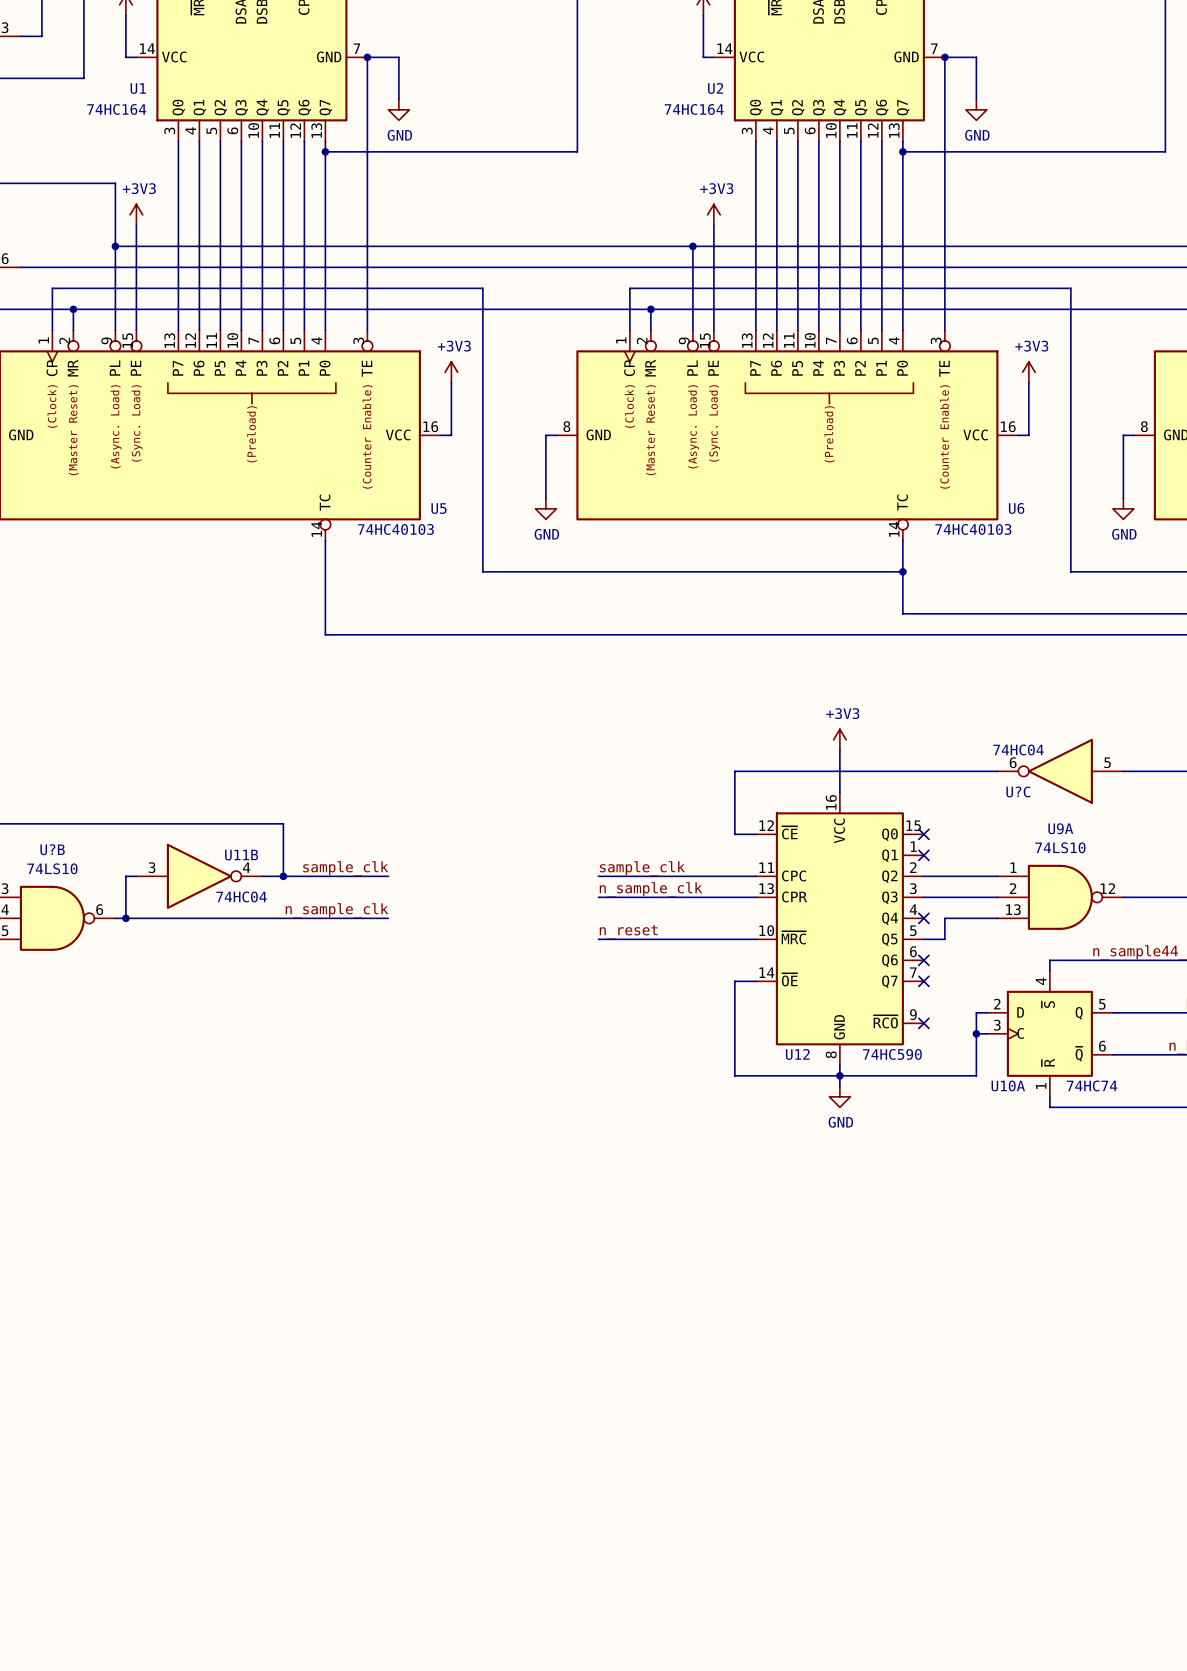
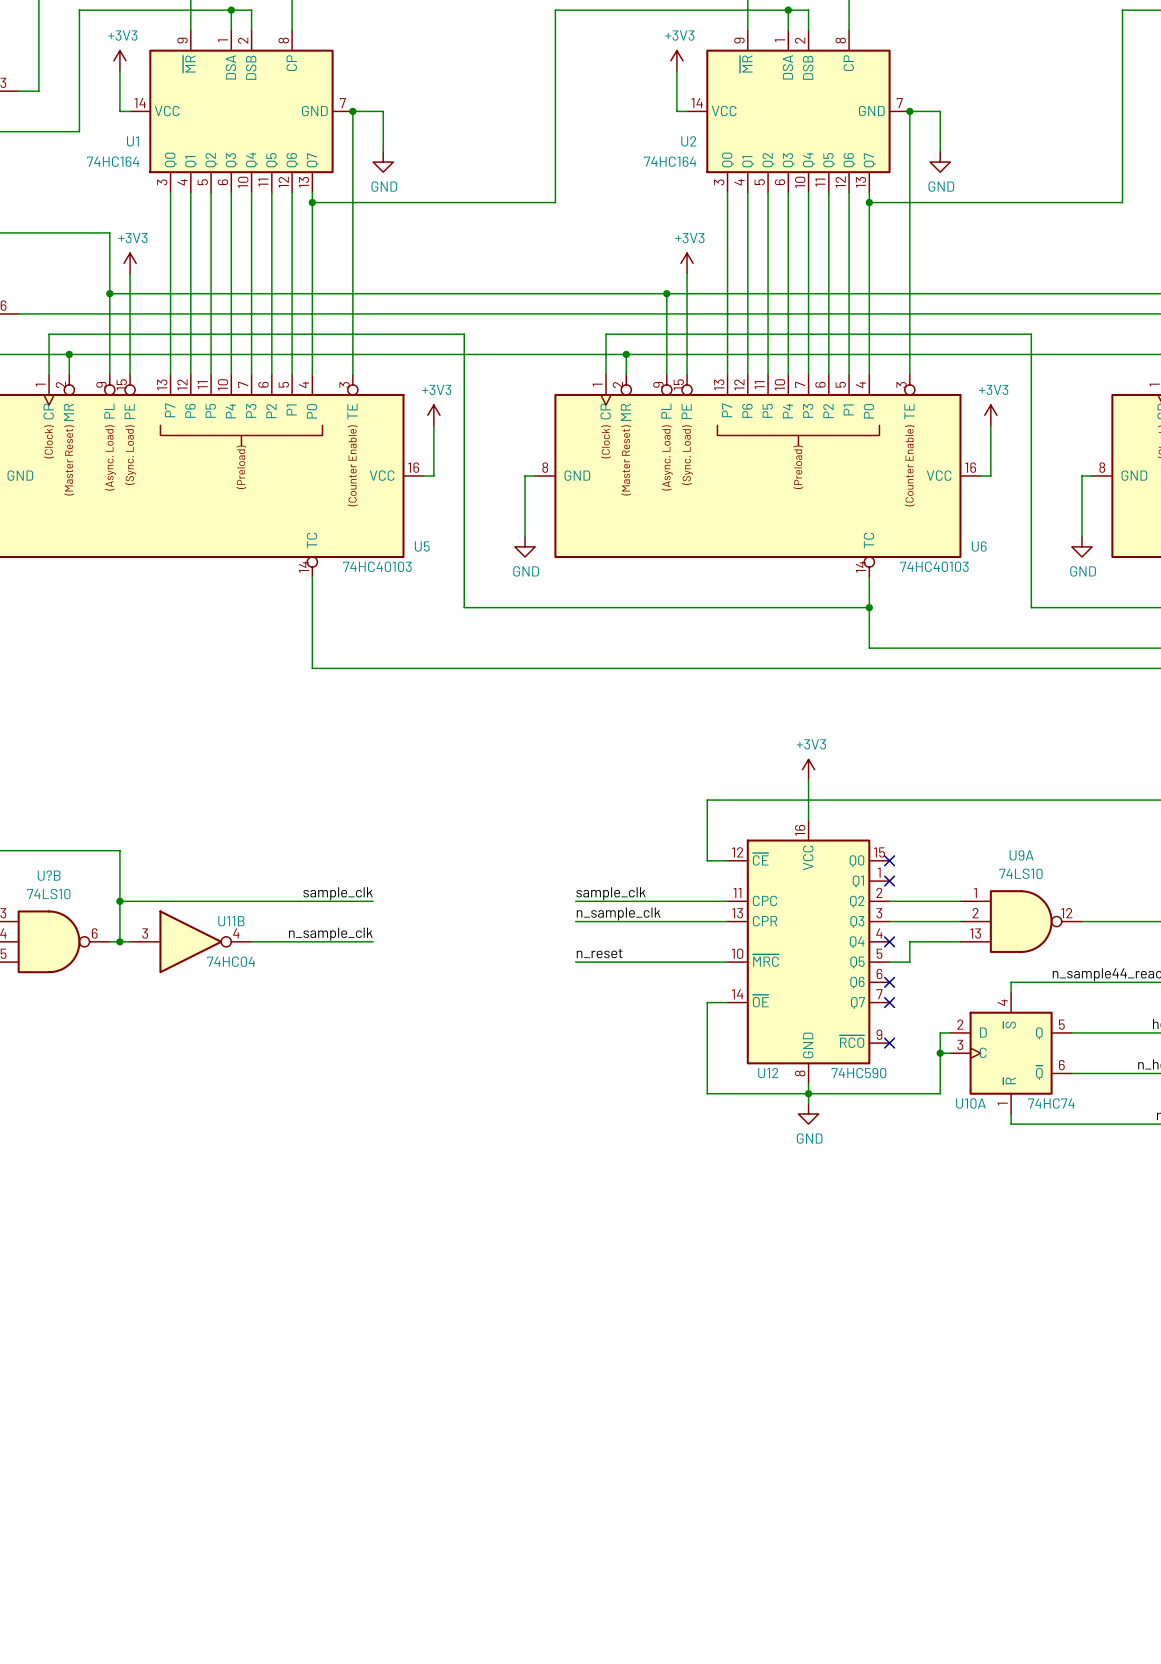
U?C: 74HC04 (1060, 771) -> none
wire: (125, 823) (283, 823) (283, 876) -> (119, 850) (119, 901)
junction: none -> (119, 901)
U11B position: (199, 876) -> (190, 941)
junction: (283, 876) -> none

